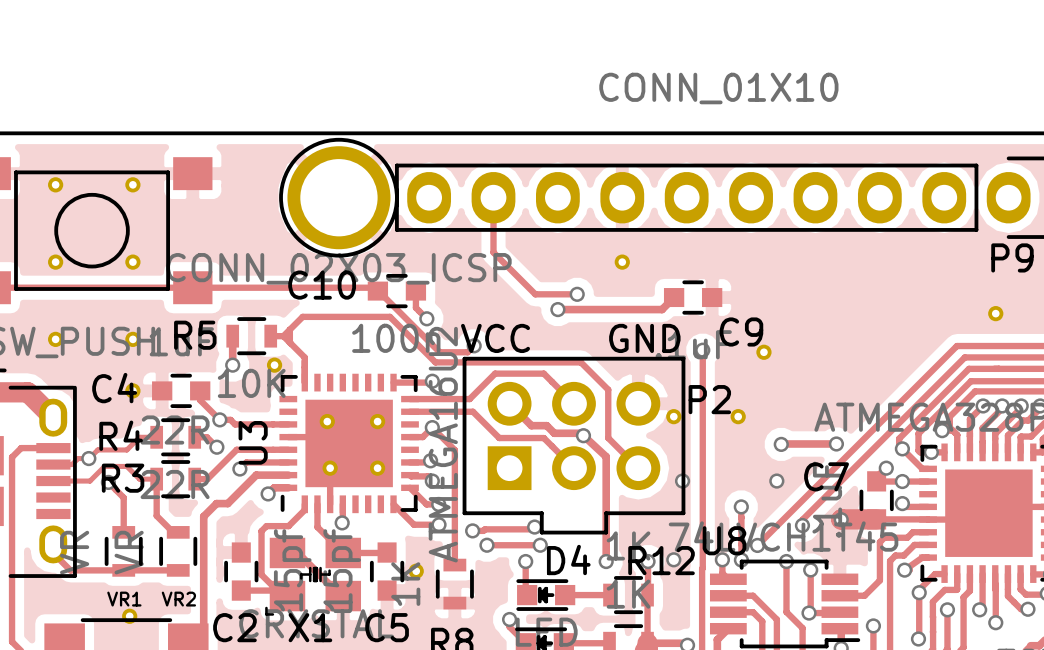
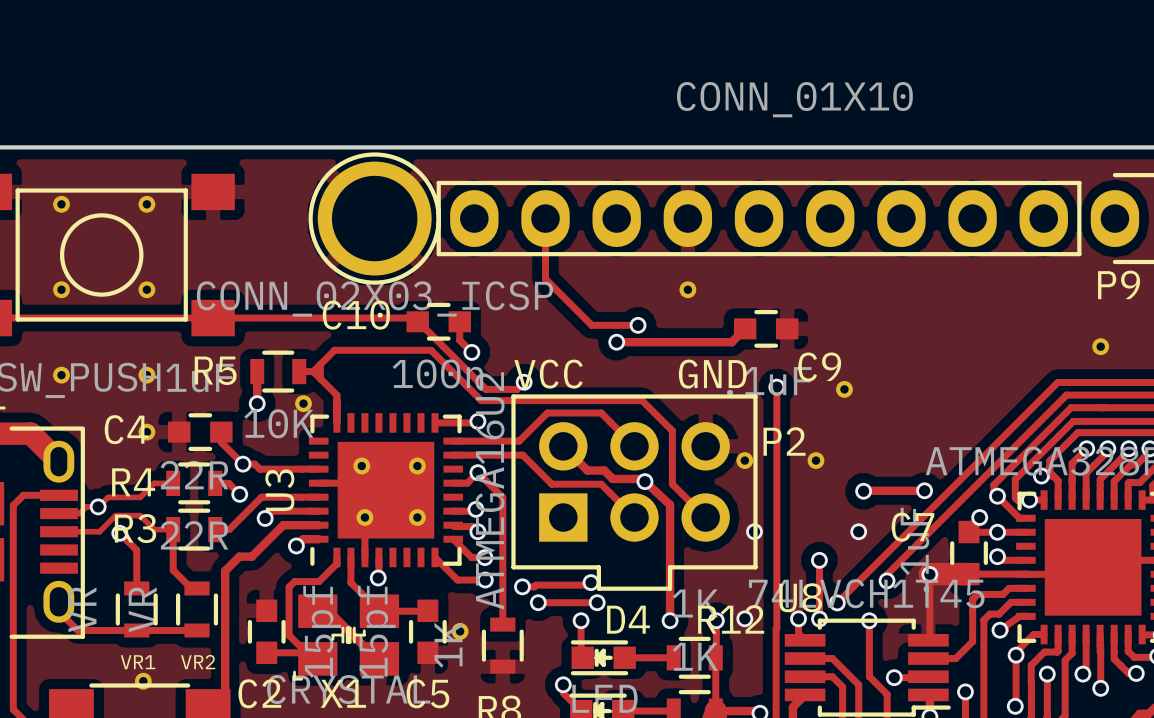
track: none -> (929, 574) (928, 640)
track: (810, 569) (810, 611) (809, 613) -> none
via: (810, 569) -> none

